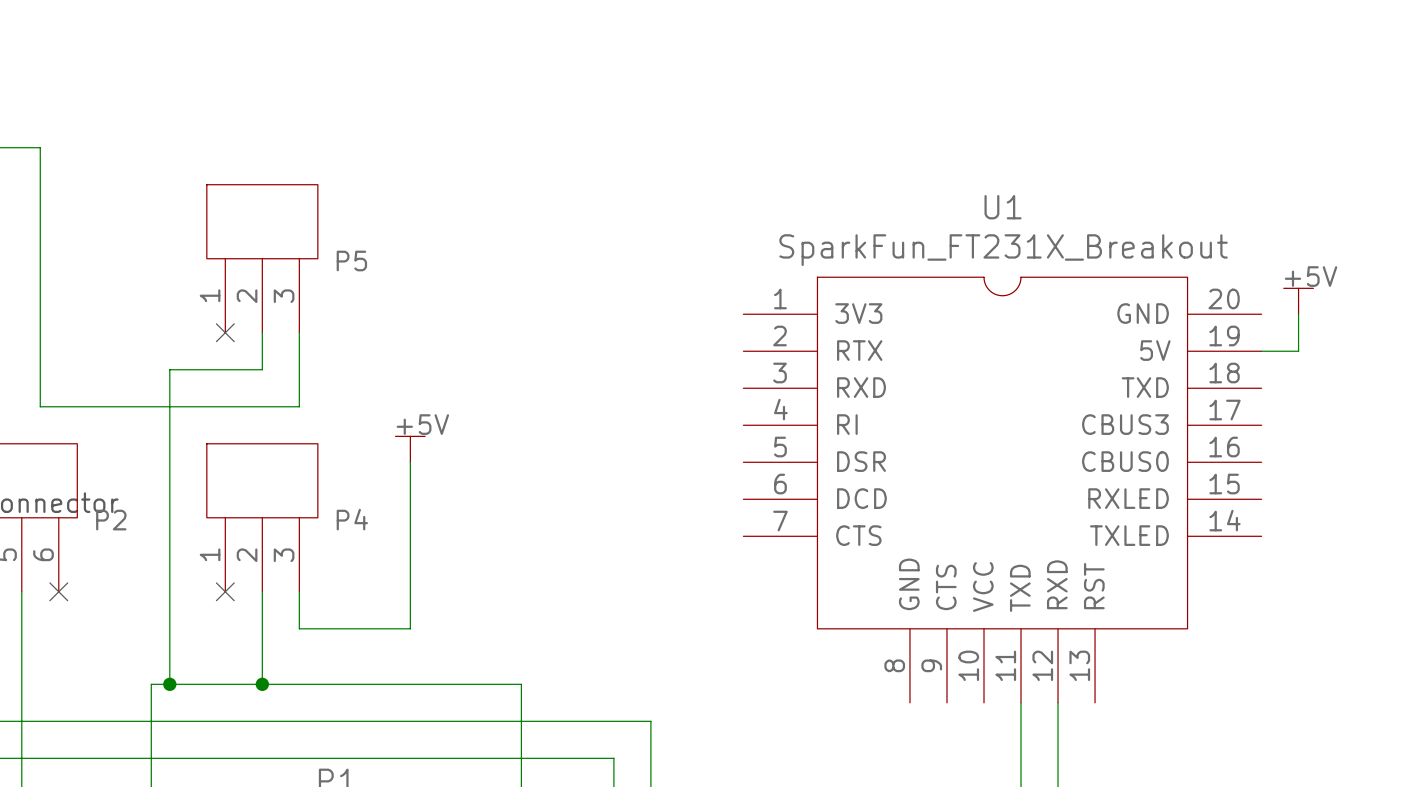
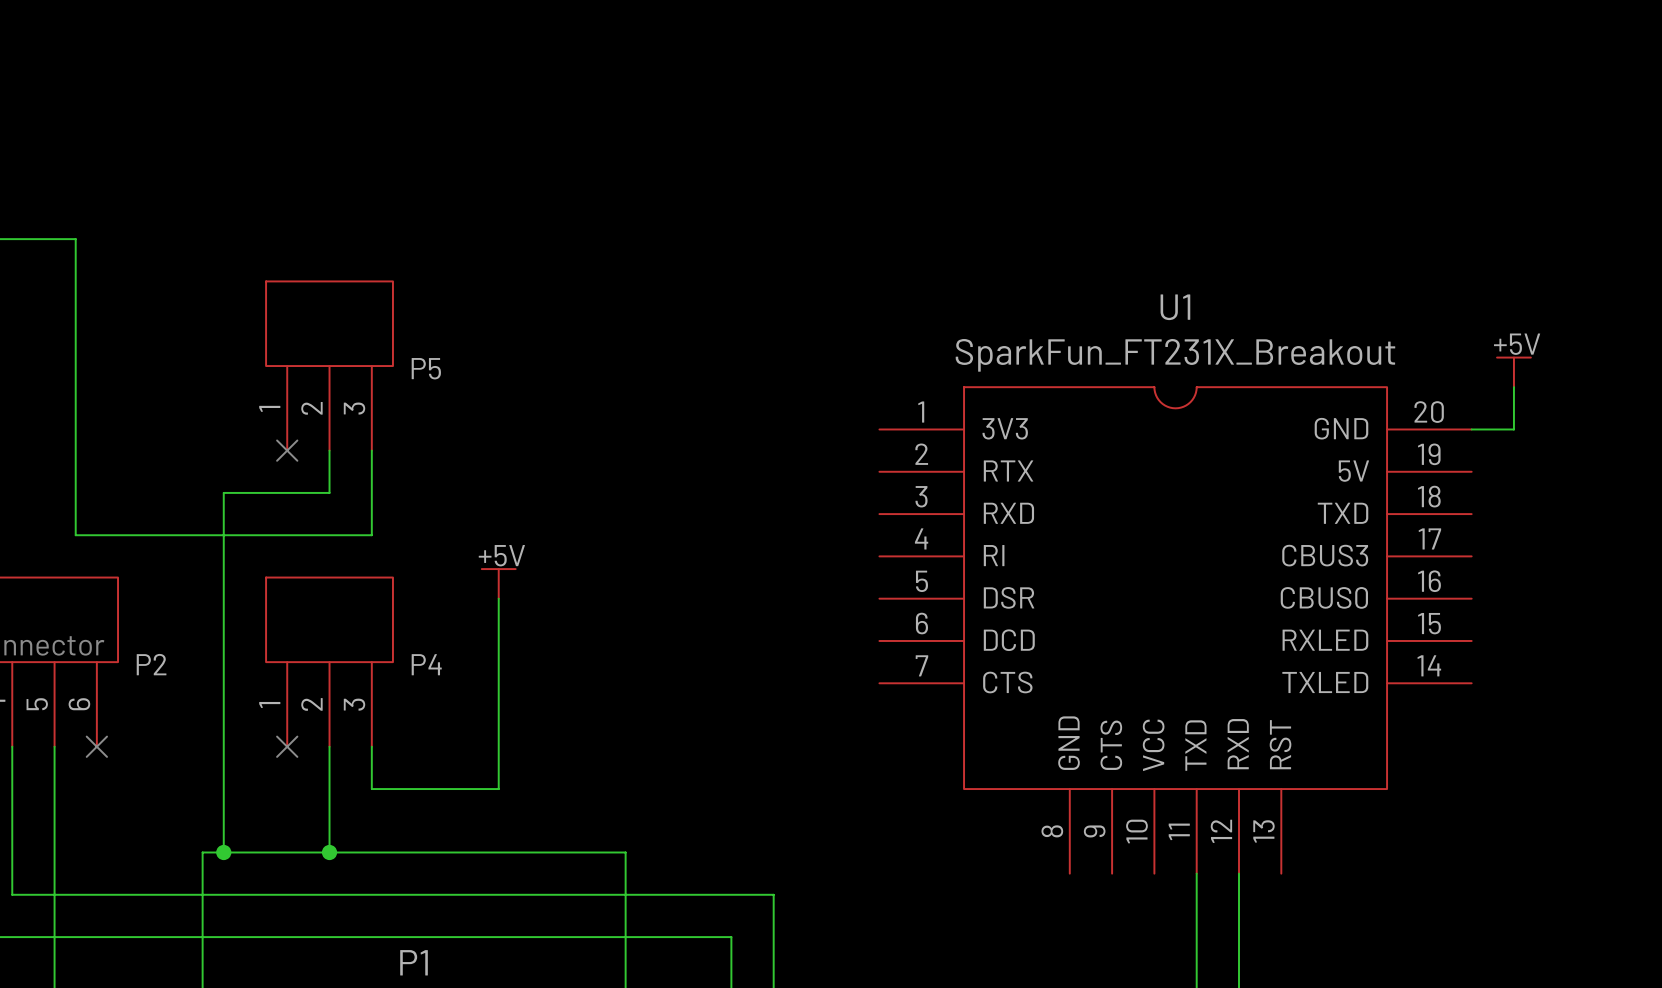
power symbol position: +5V (1298, 301) -> +5V (1513, 372)
wire: (1298, 314) (1298, 351) (1261, 351) -> (1513, 387) (1513, 429) (1471, 429)

